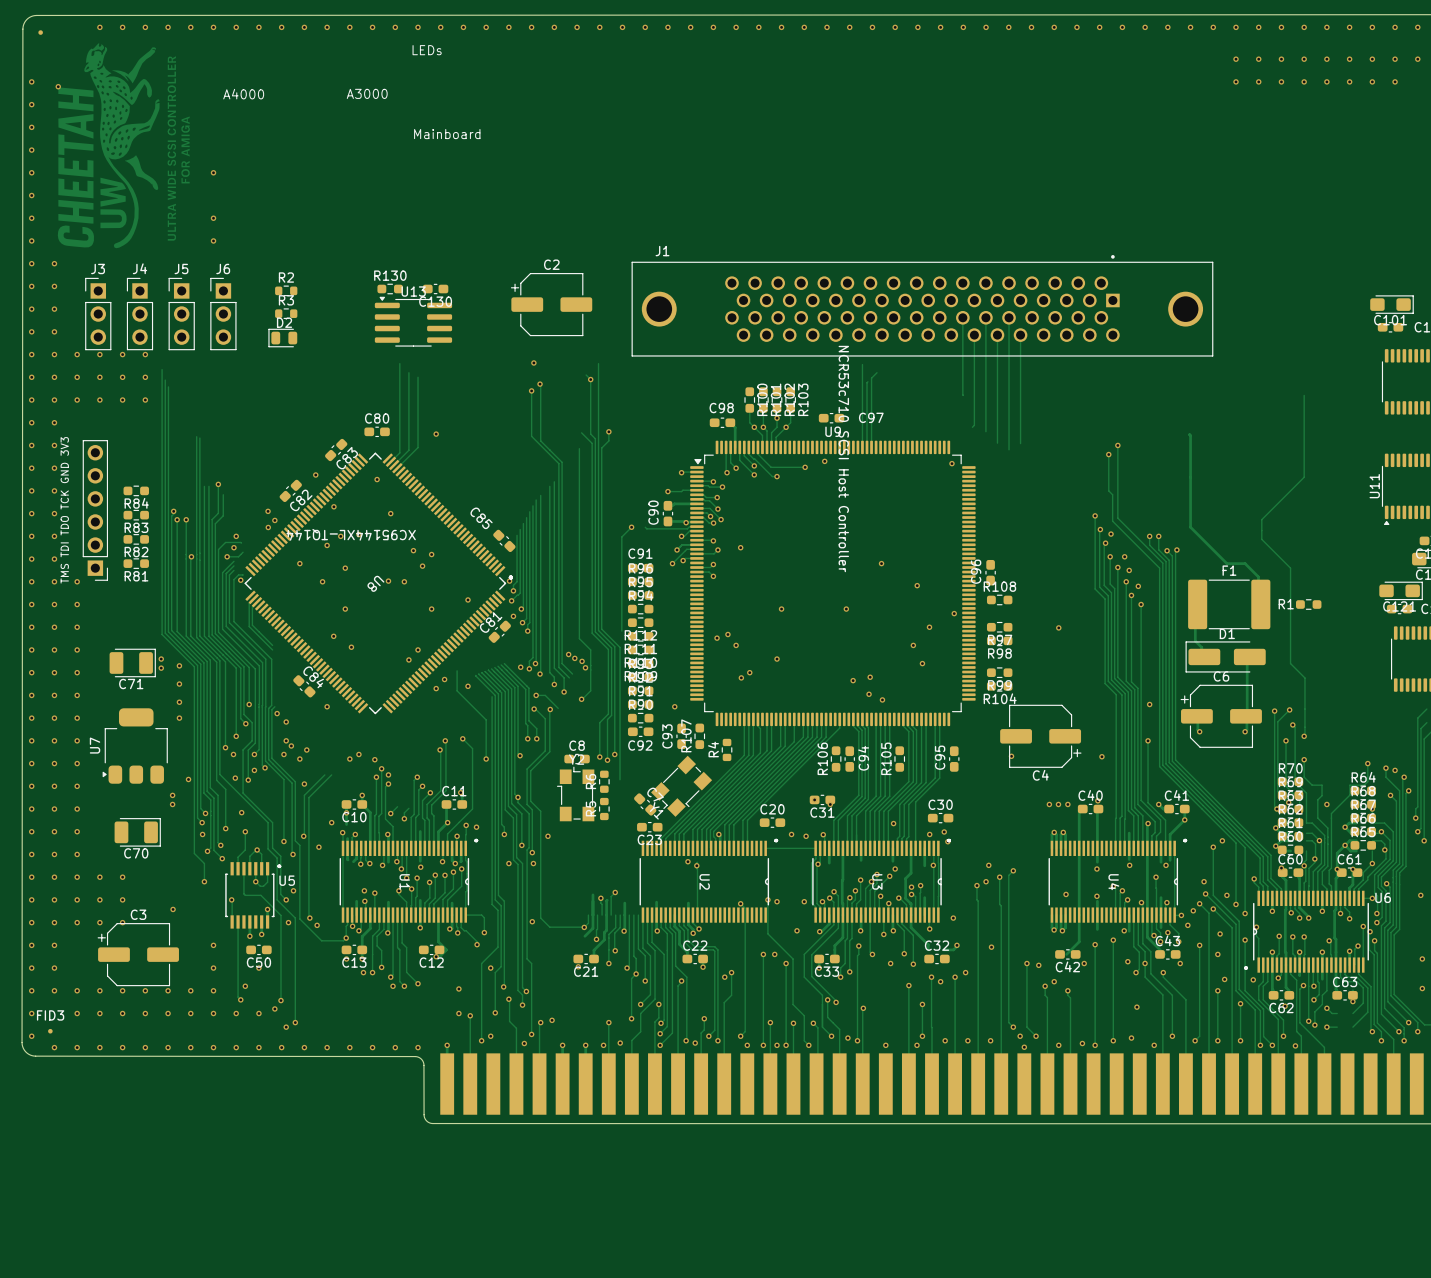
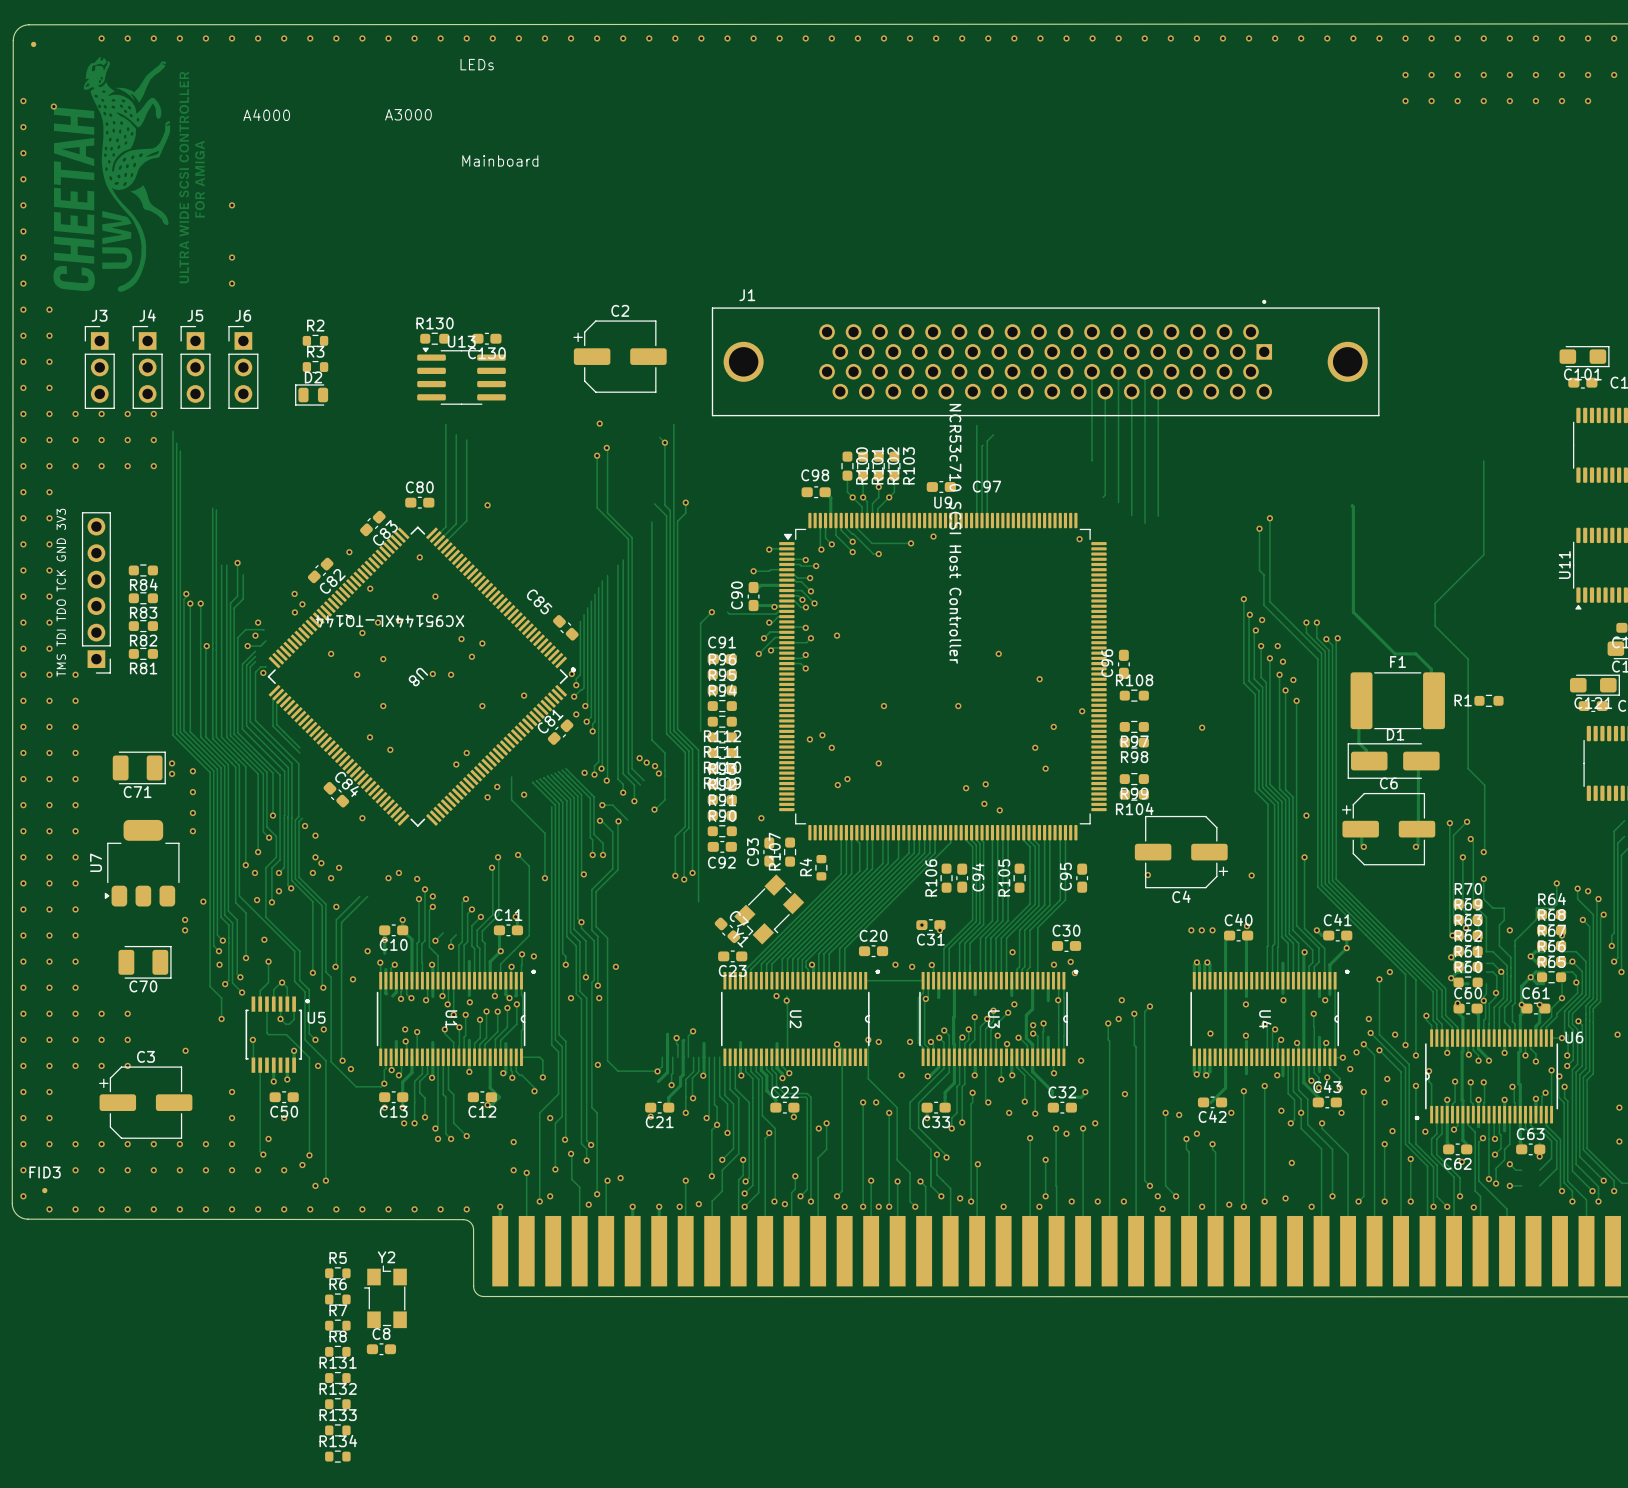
C8 position: (577, 759) -> (381, 1349)
R6 rotation: 0° (604, 781) -> 90° clockwise (337, 1299)
R6 position: (604, 781) -> (337, 1299)
Y2 position: (575, 793) -> (385, 1296)
R5 rotation: 0° (604, 809) -> 90° clockwise (337, 1273)
R5 position: (604, 809) -> (337, 1273)
R7: none -> (337, 1325)
R8: none -> (337, 1351)
R131: none -> (337, 1378)
R132: none -> (337, 1404)
R133: none -> (337, 1430)
R134: none -> (337, 1456)

